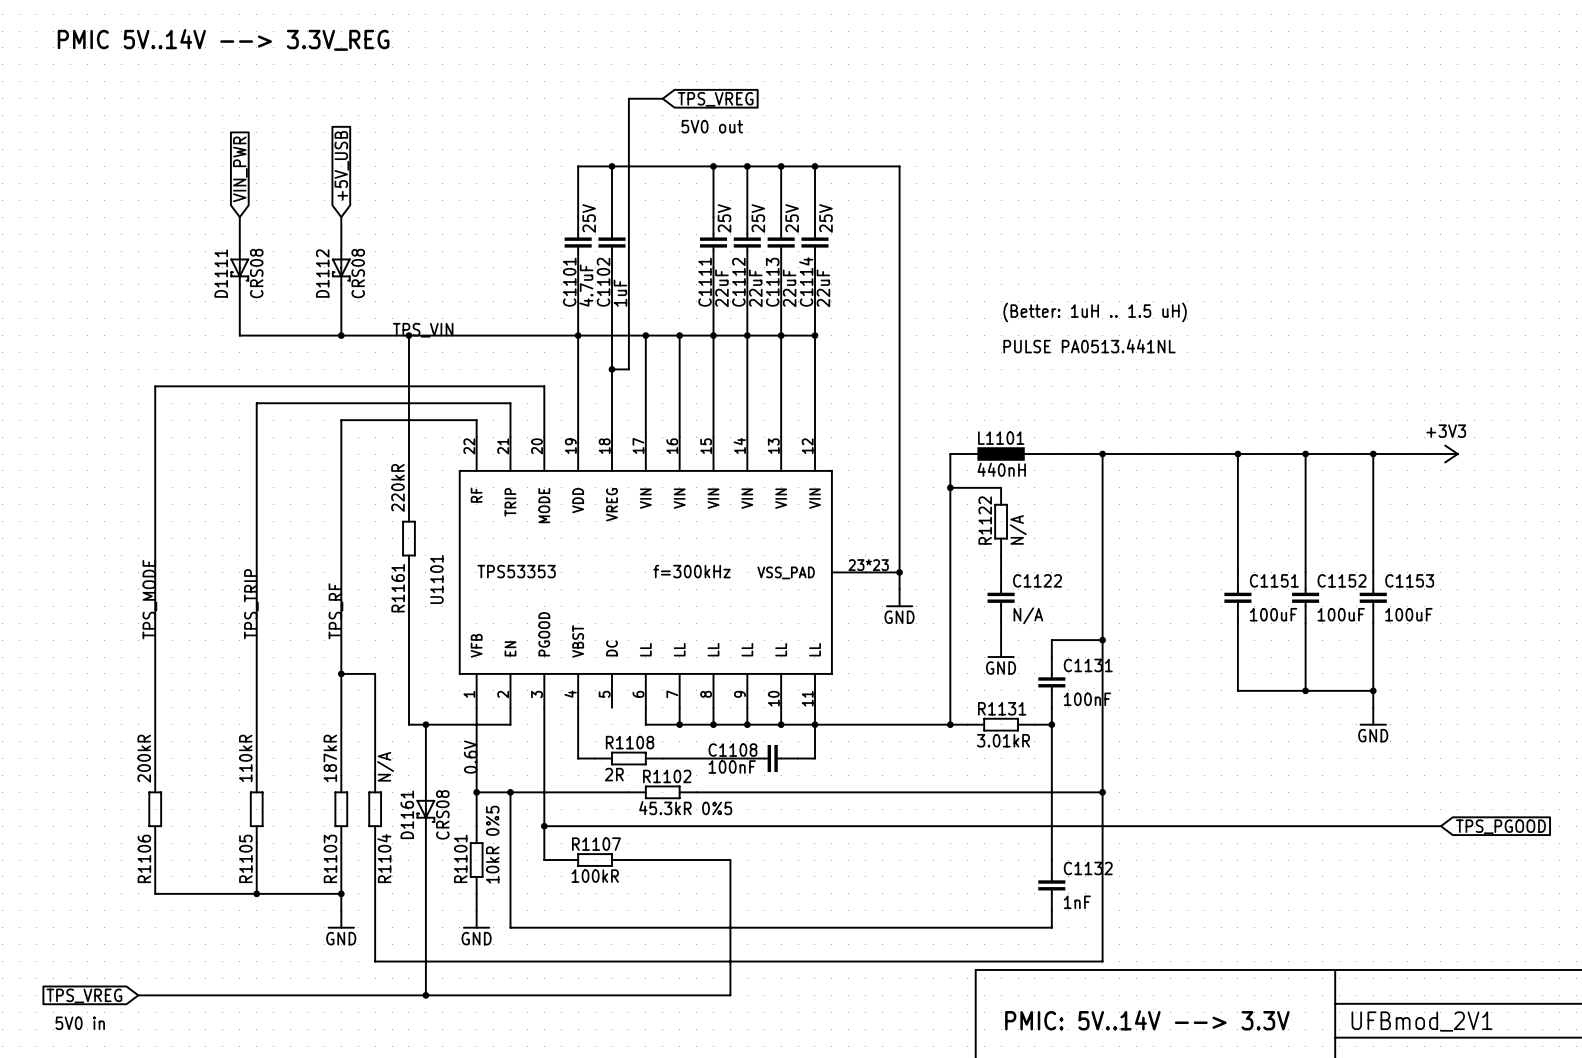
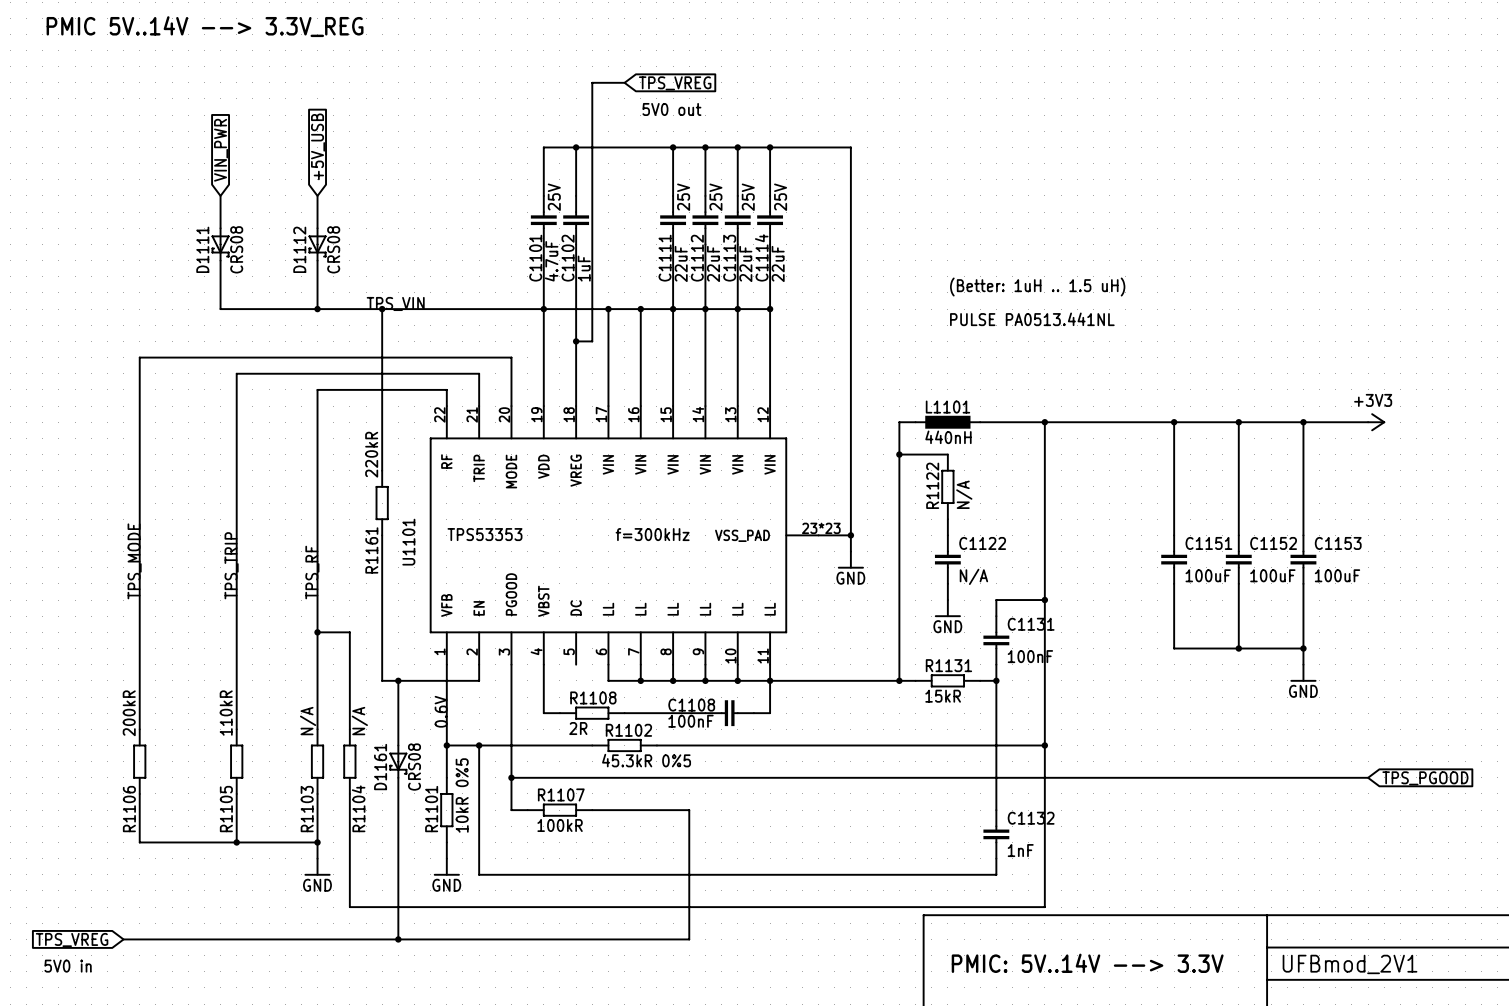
R1131 value: 3.01kR (1003, 740) -> 15kR (943, 696)
R1103 value: 187kR (330, 758) -> N/A (308, 721)

